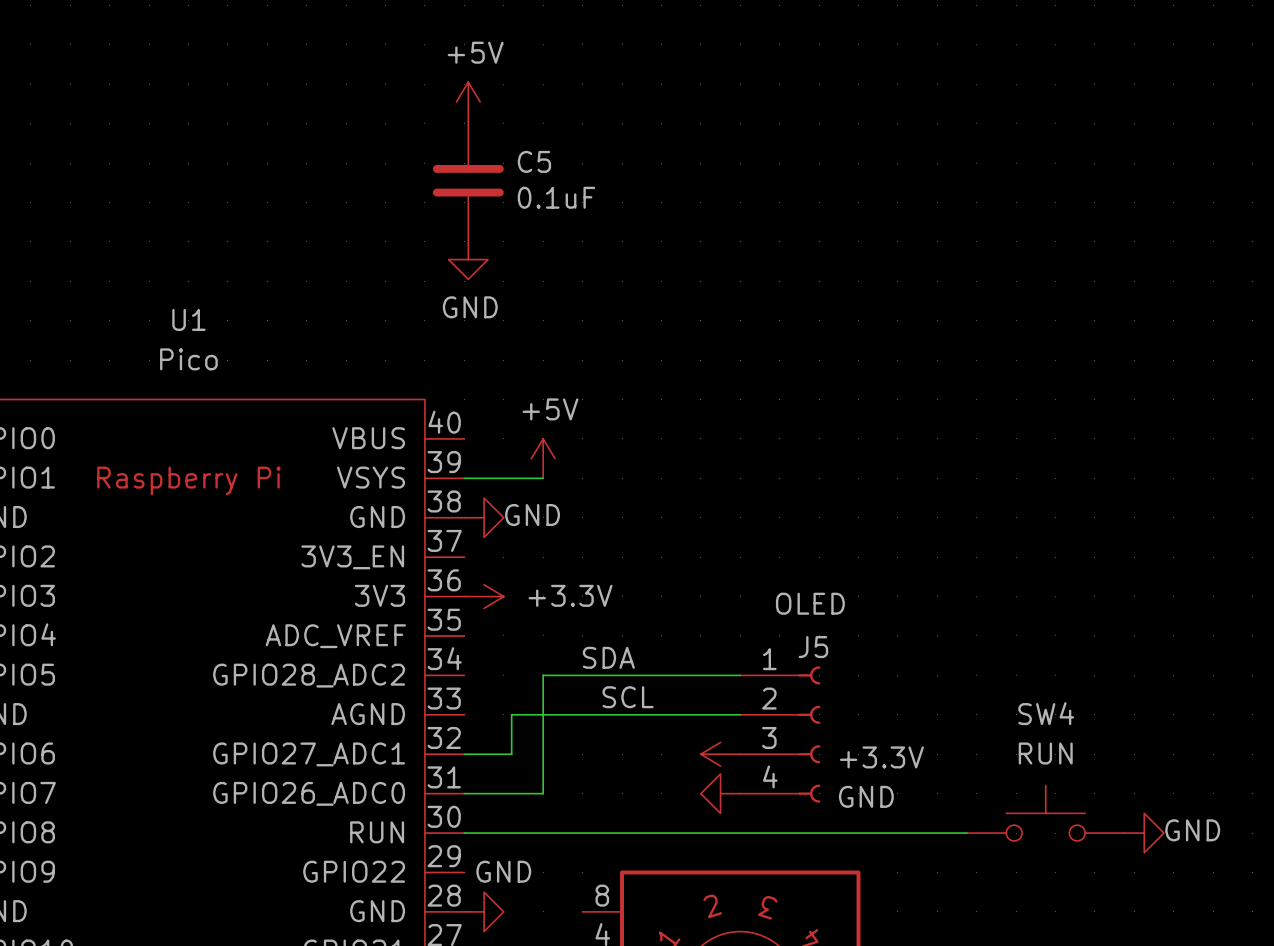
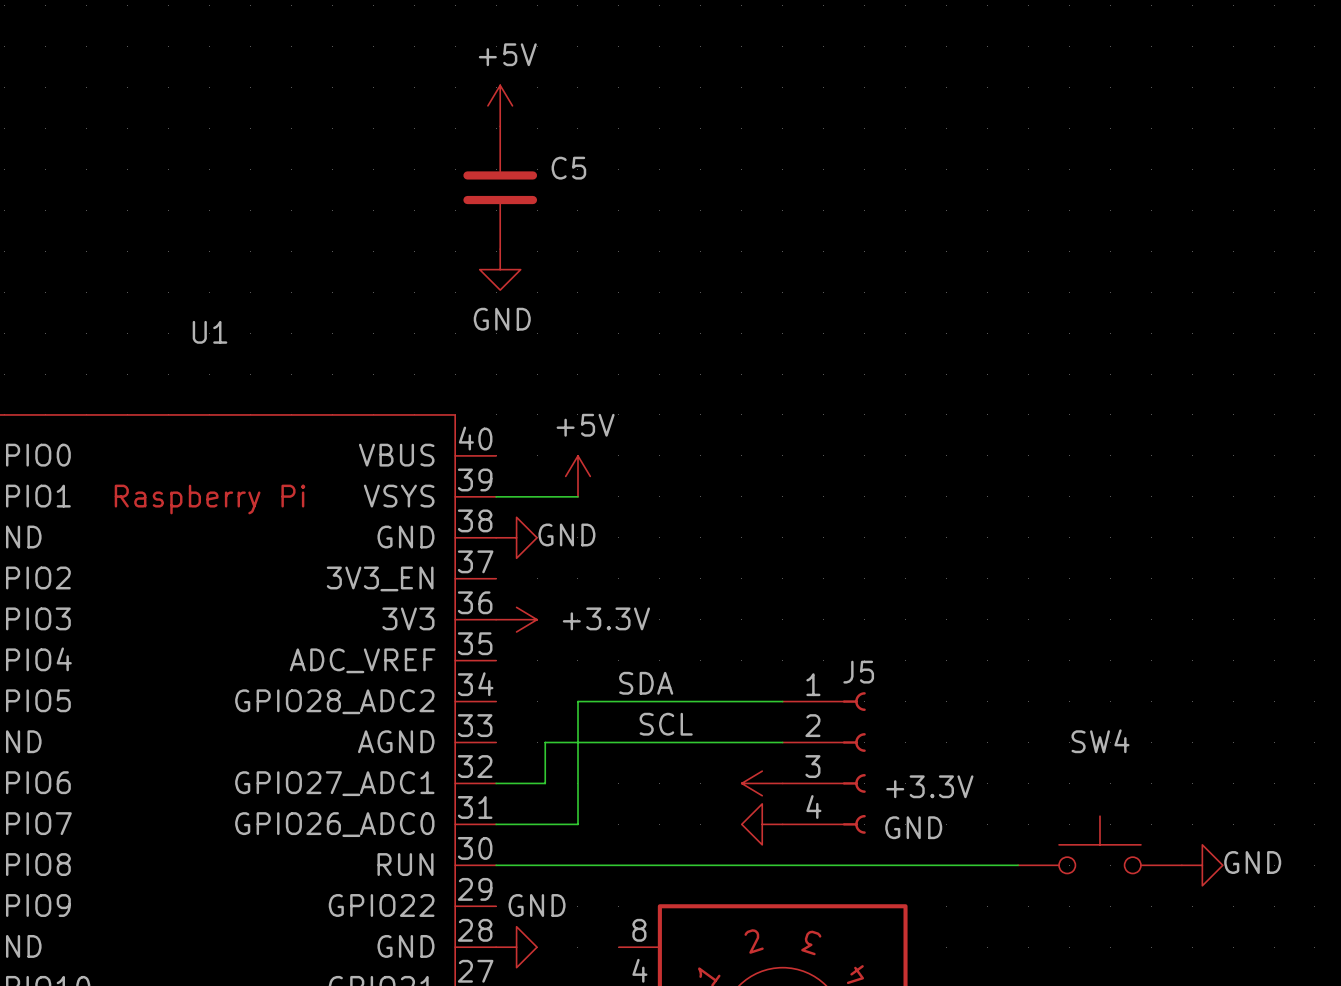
C5 value: 0.1uF (556, 197) -> none
U1 value: Pico (188, 359) -> none
J5 value: OLED (810, 603) -> none
SW4 value: RUN (1045, 753) -> none

